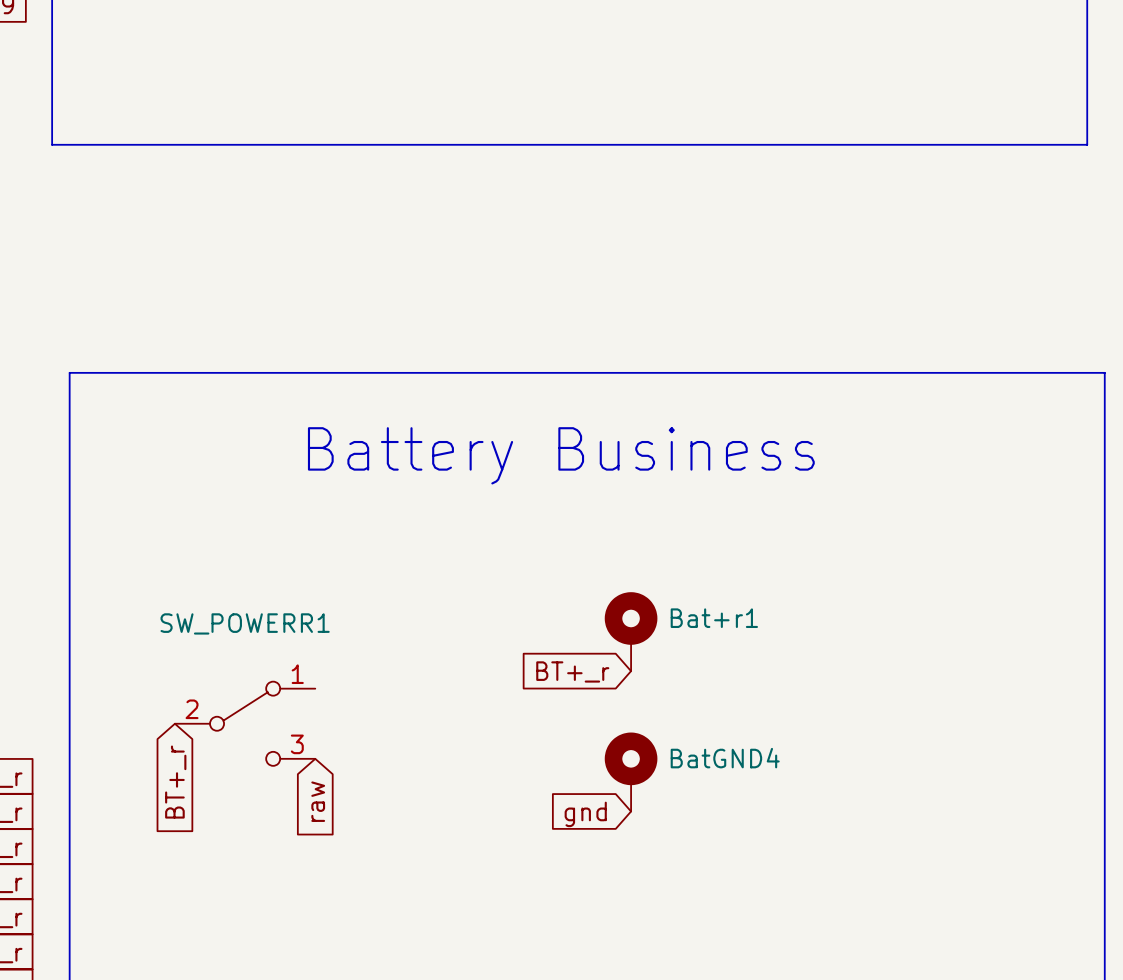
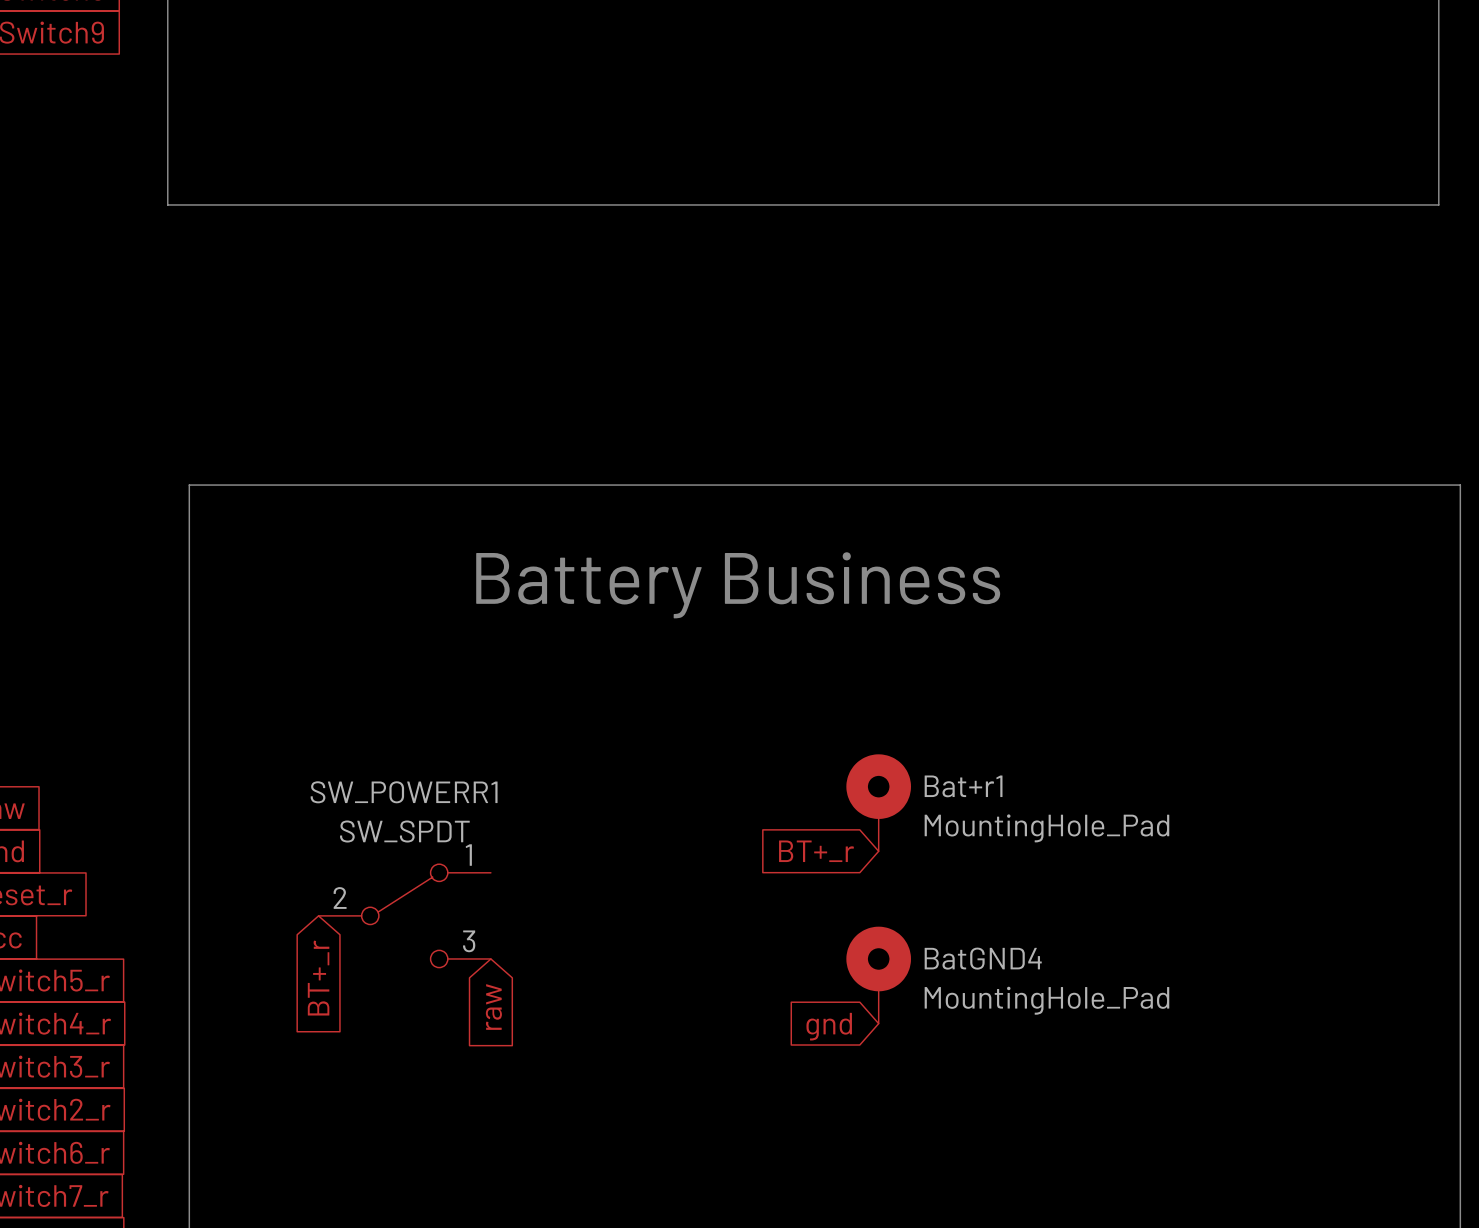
Bat+r1 value: none -> MountingHole_Pad (1046, 828)
SW_POWERR1 value: none -> SW_SPDT (404, 831)
BatGND4 value: none -> MountingHole_Pad (1046, 1000)

